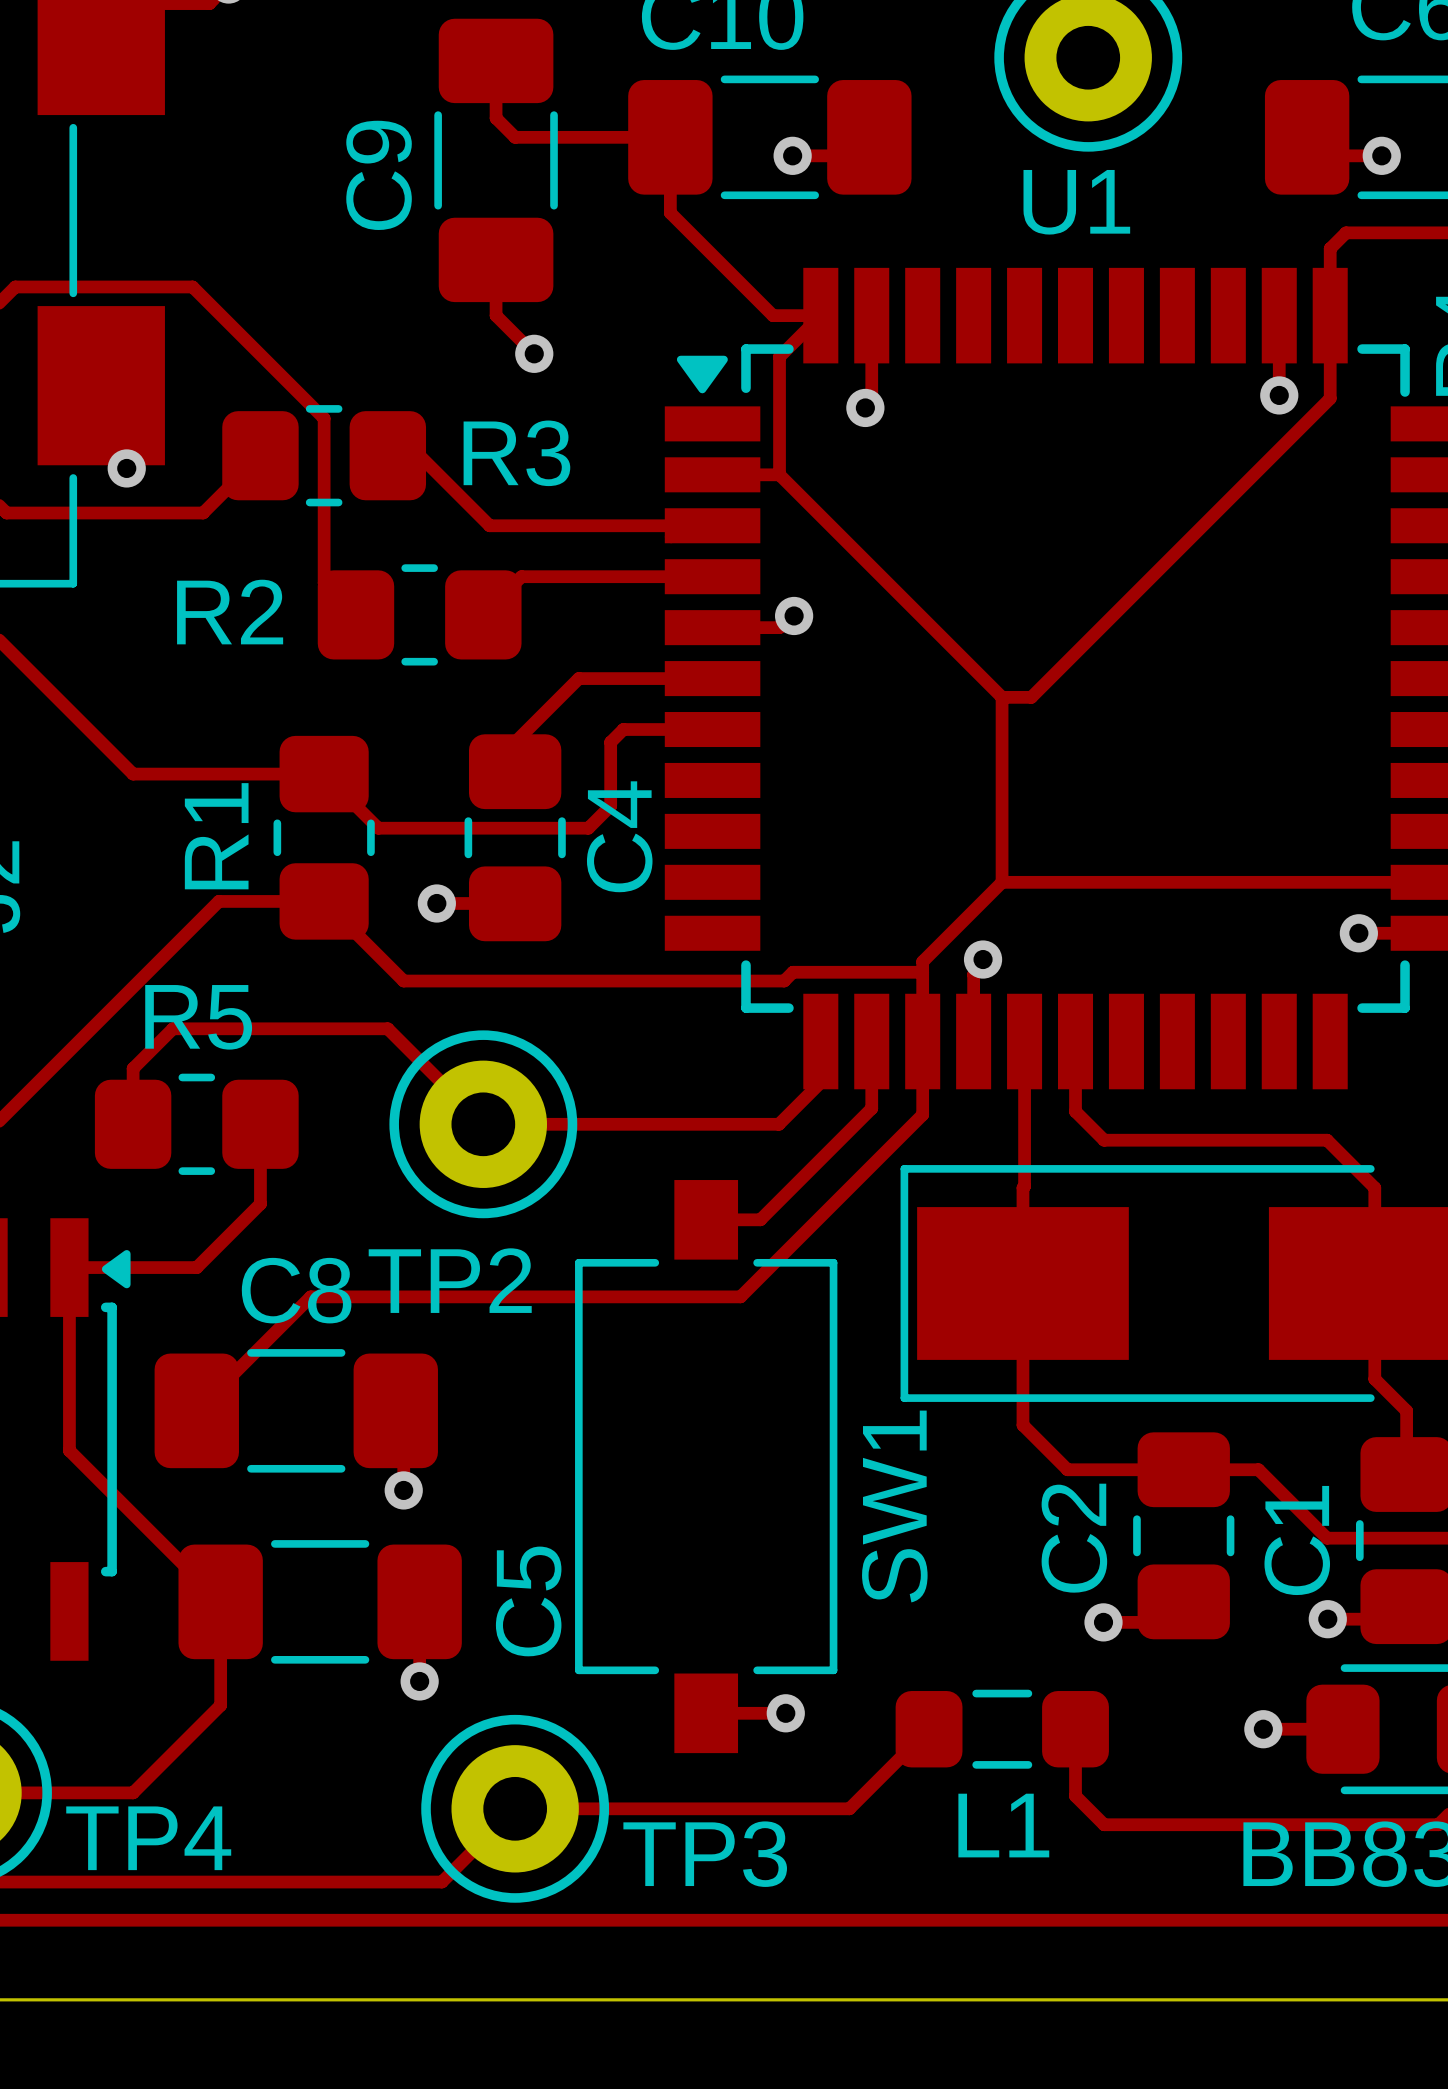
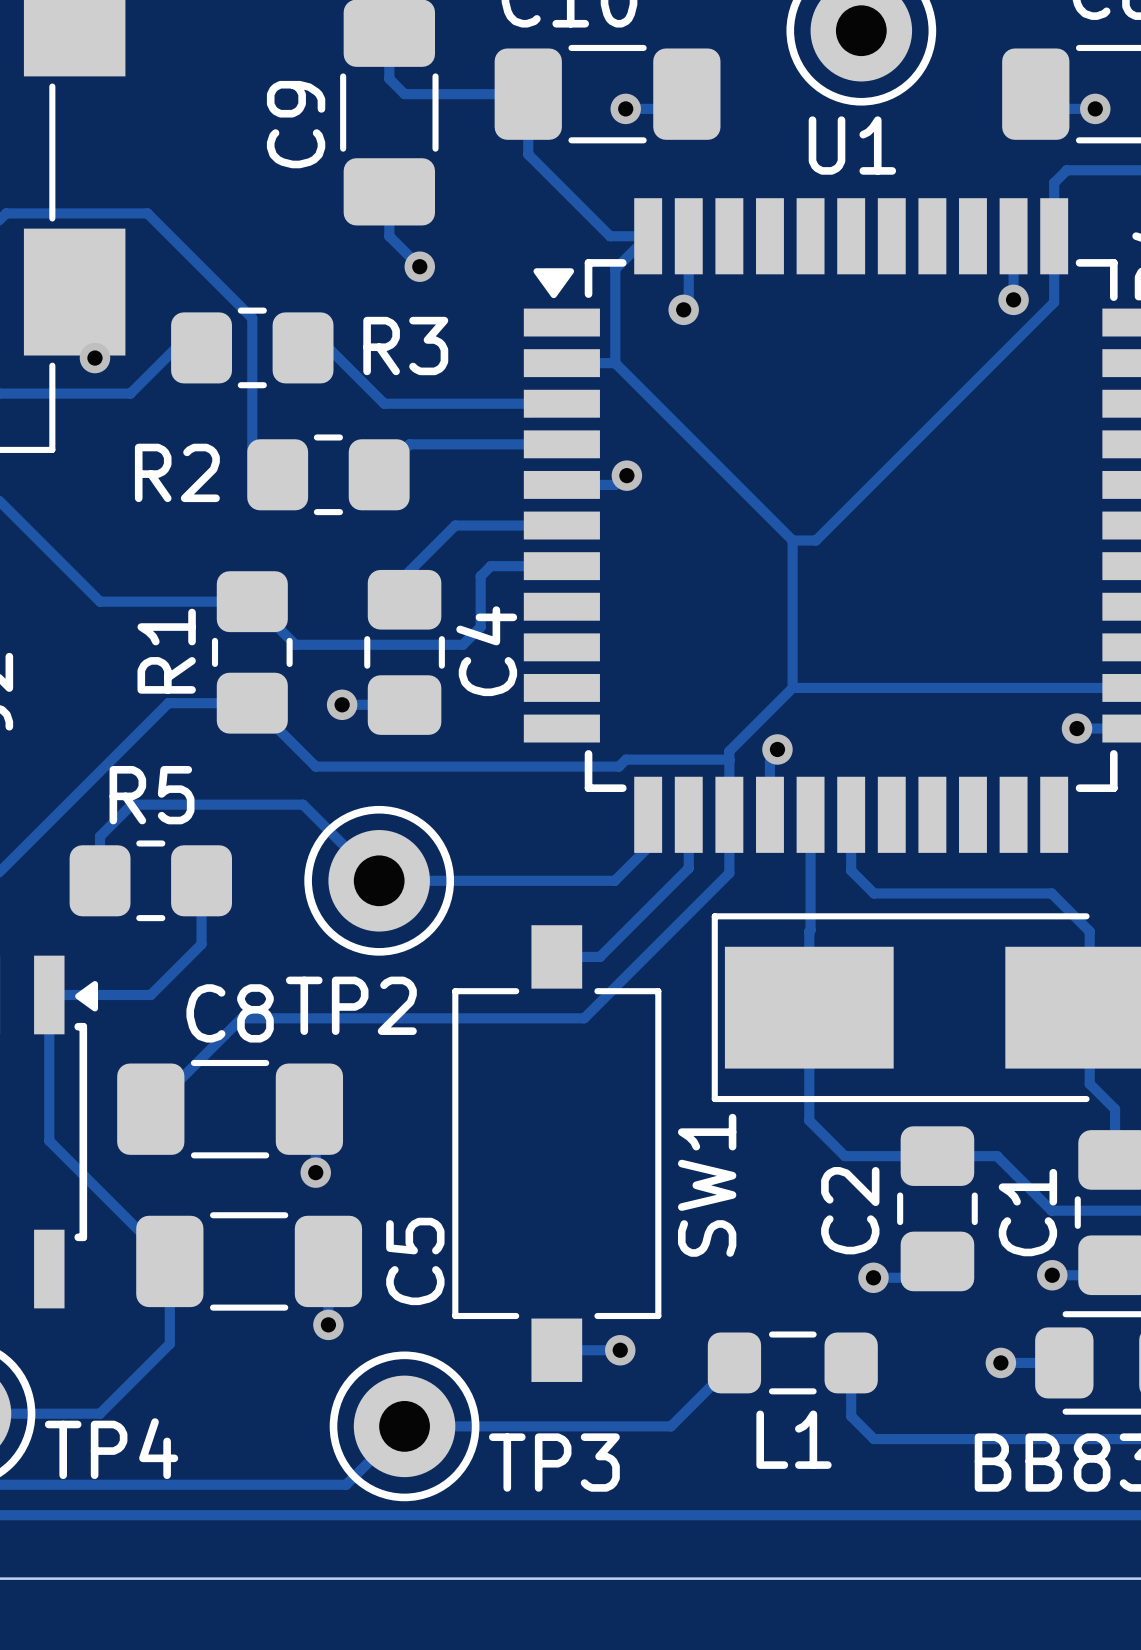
track: (260, 455) (203, 513) (171, 513) -> (201, 347) (176, 347) (130, 393)

